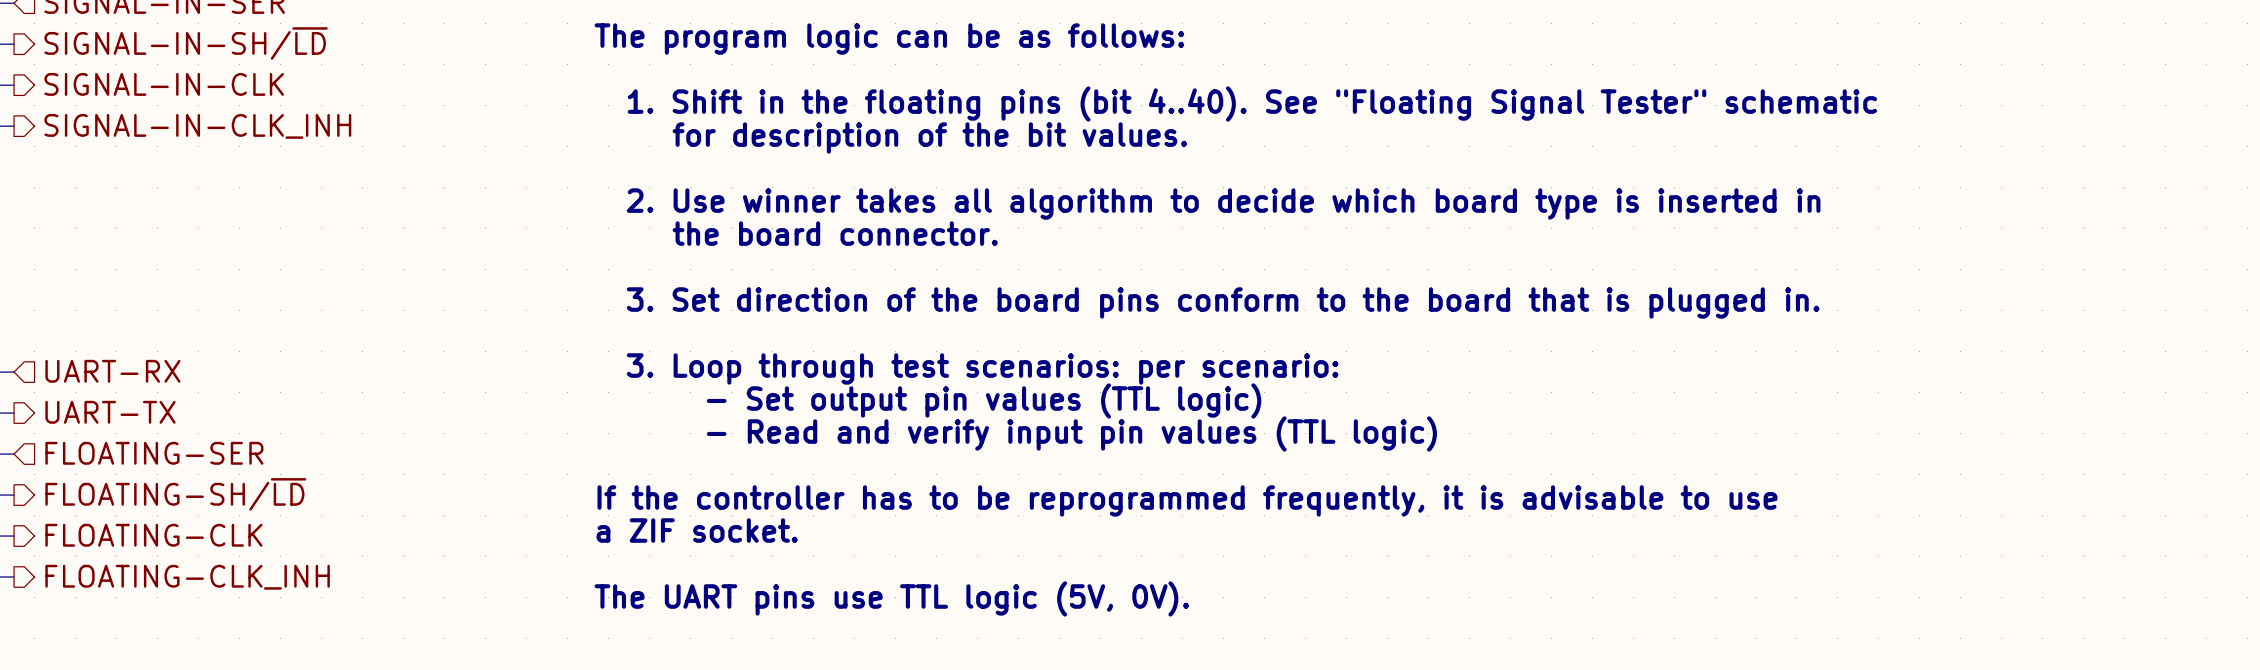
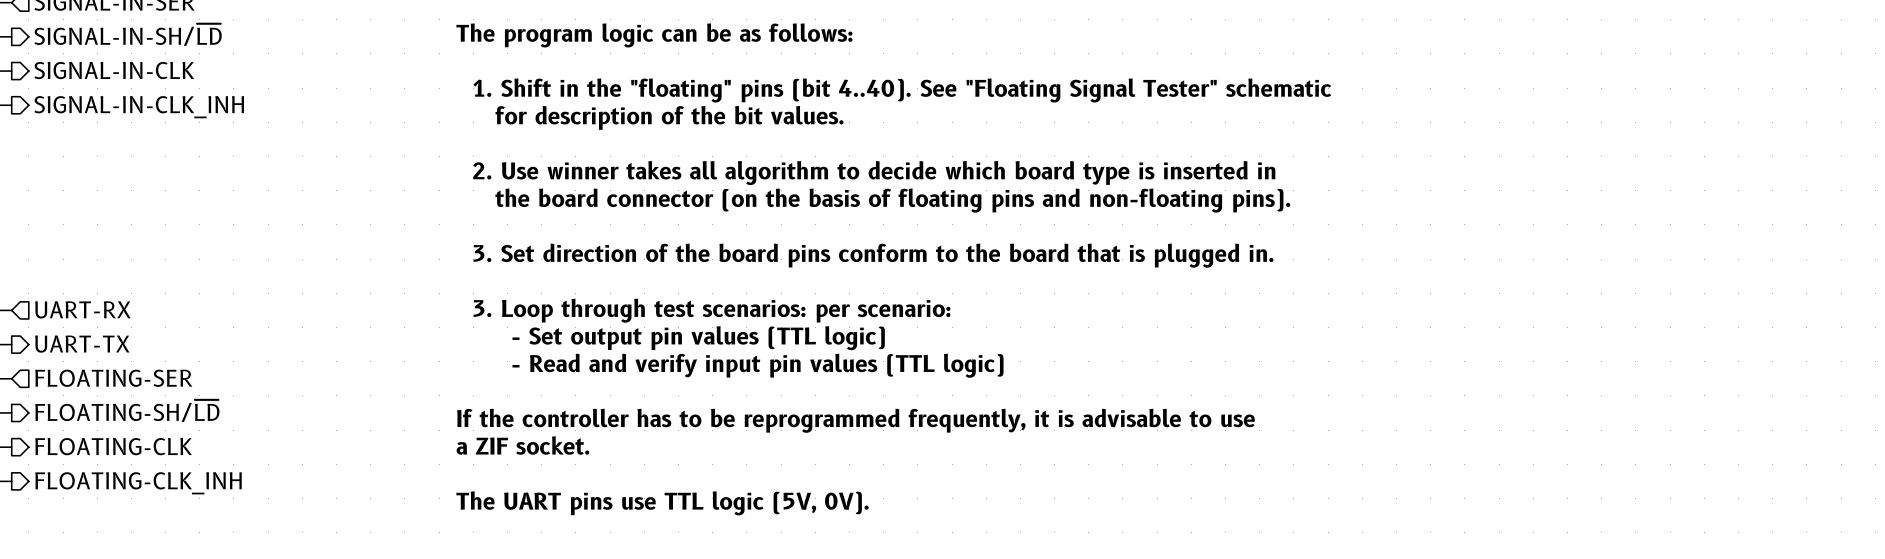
text position: The program logic can be as follows: (889, 39) -> The program logic can be as follows: (654, 35)
text: 1. Shift in the floating pins (bit 4..40). See "Floating Signal Tester" schematic (1252, 104) -> 1. Shift in the "floating" pins (bit 4..40). See "Floating Signal Tester" schematic (902, 90)
text position: for description of the bit values. (929, 137) -> for description of the bit values. (669, 117)
text position: 2. Use winner takes all algorithm to decide which board type is inserted in (1223, 203) -> 2. Use winner takes all algorithm to decide which board type is inserted in (874, 173)
text: the board connector. (835, 233) -> none
text: none -> the board connector (on the basis of floating pins and non-floating pins). (892, 200)
text position: 3. Set direction of the board pins conform to the board that is plugged in. (1223, 302) -> 3. Set direction of the board pins conform to the board that is plugged in. (873, 255)
text position: 3. Loop through test scenarios: per scenario: (982, 368) -> 3. Loop through test scenarios: per scenario: (711, 310)
text position: - Set output pin values (TTL logic) (984, 400) -> - Set output pin values (TTL logic) (698, 338)
text position: - Read and verify input pin values (TTL logic) (1071, 433) -> - Read and verify input pin values (TTL logic) (758, 365)
text position: If the controller has to be reprogrammed frequently, it is advisable to use (1187, 500) -> If the controller has to be reprogrammed frequently, it is advisable to use (855, 420)
text position: a ZIF socket. (697, 530) -> a ZIF socket. (522, 445)
text position: The UART pins use TTL logic (5V, 0V). (891, 598) -> The UART pins use TTL logic (5V, 0V). (662, 503)

